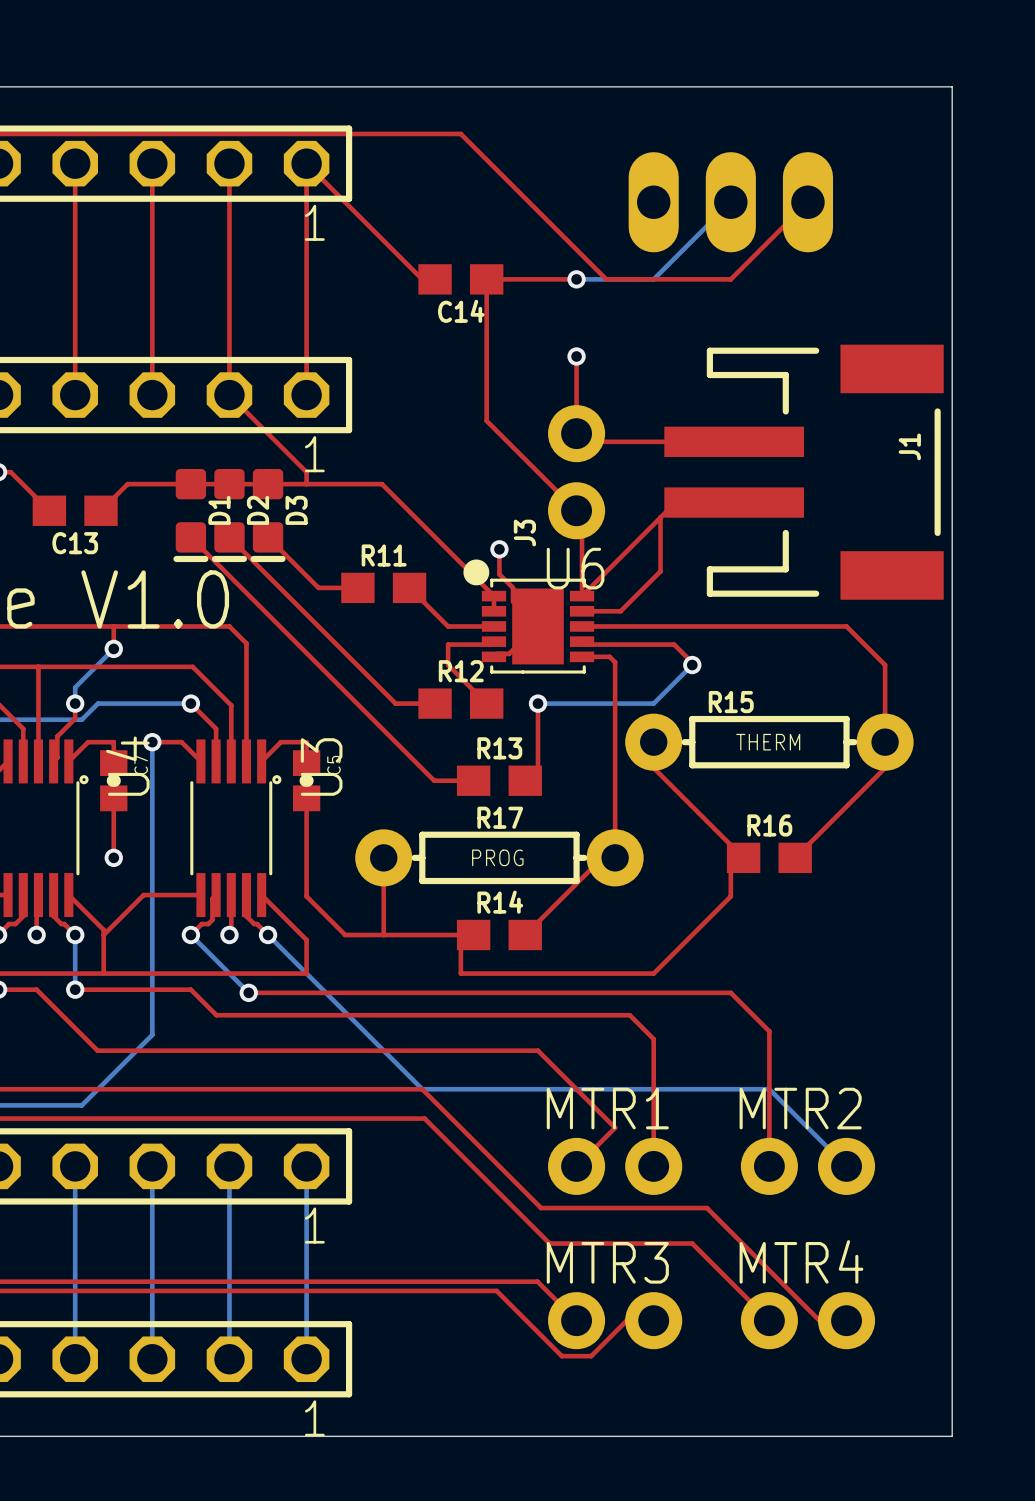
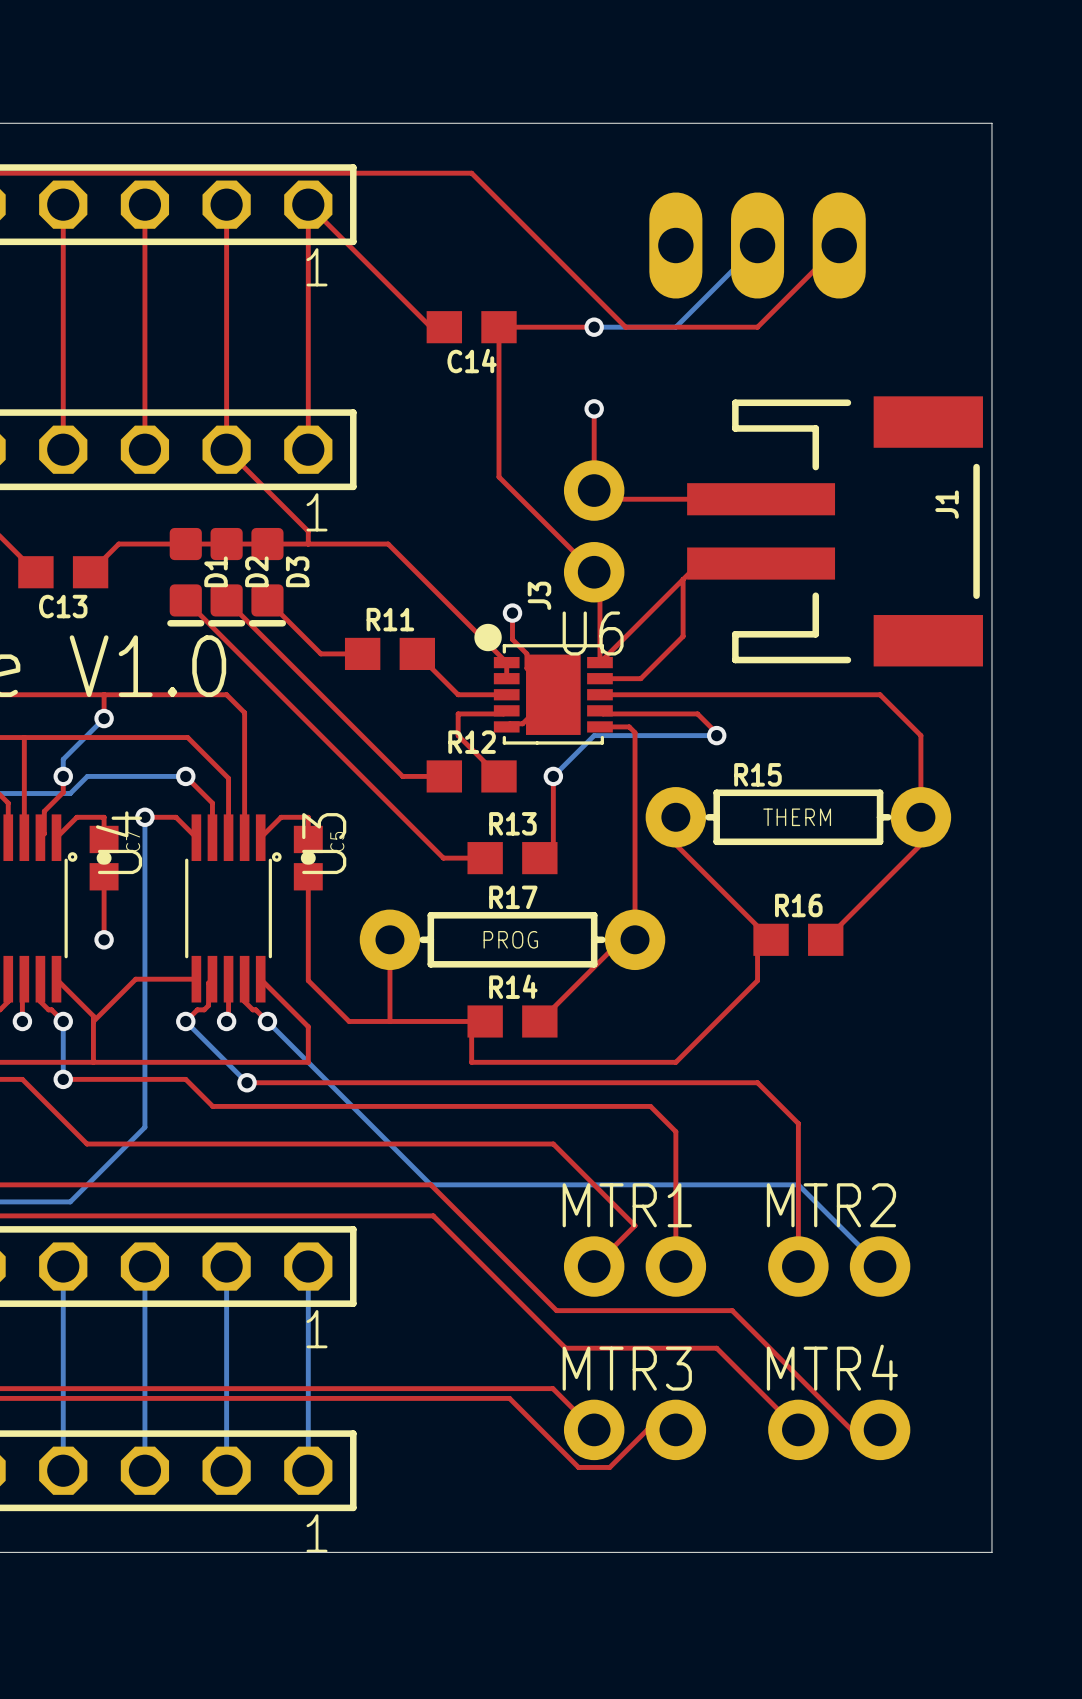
bottom track: (692, 665) (653, 703) (538, 703) -> (716, 735) (594, 735) (553, 776)

